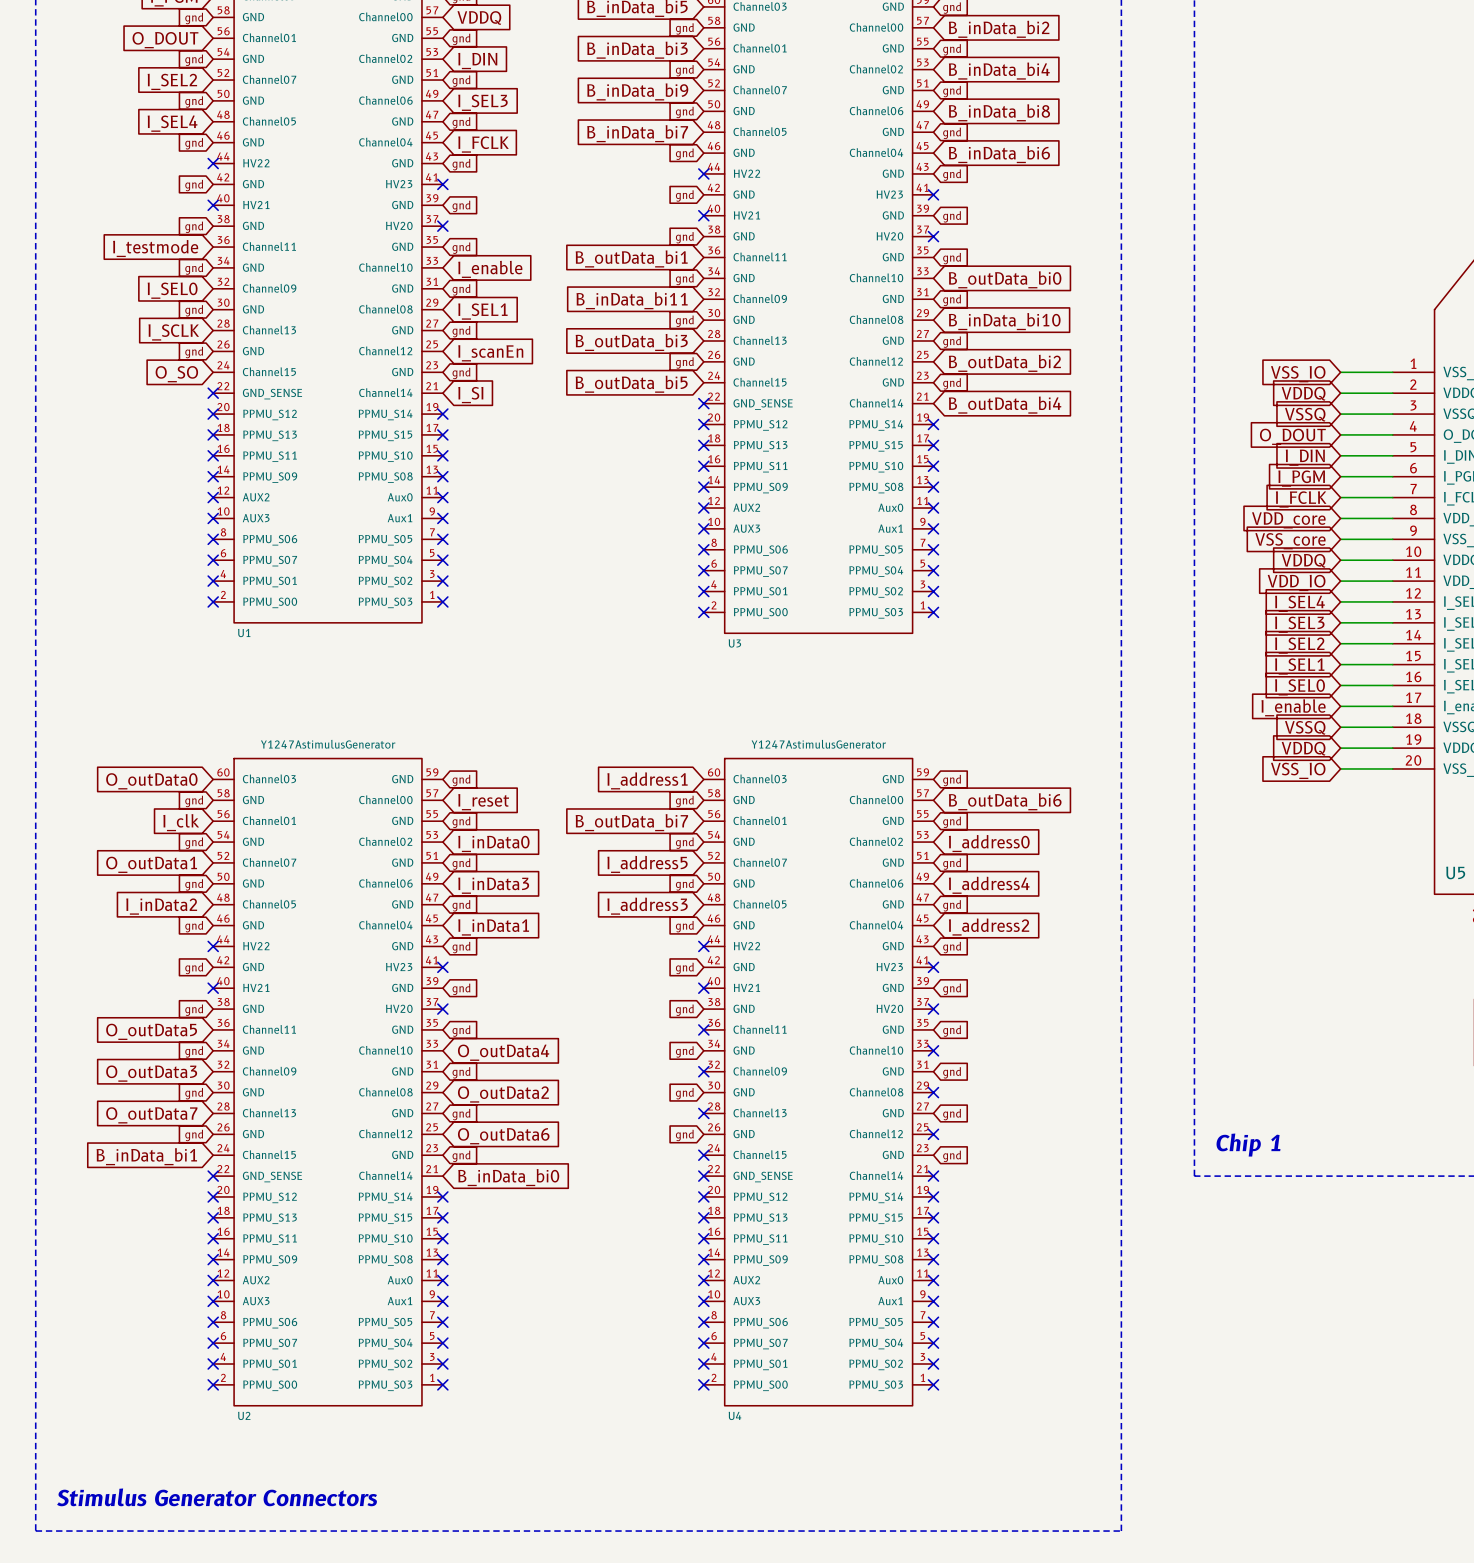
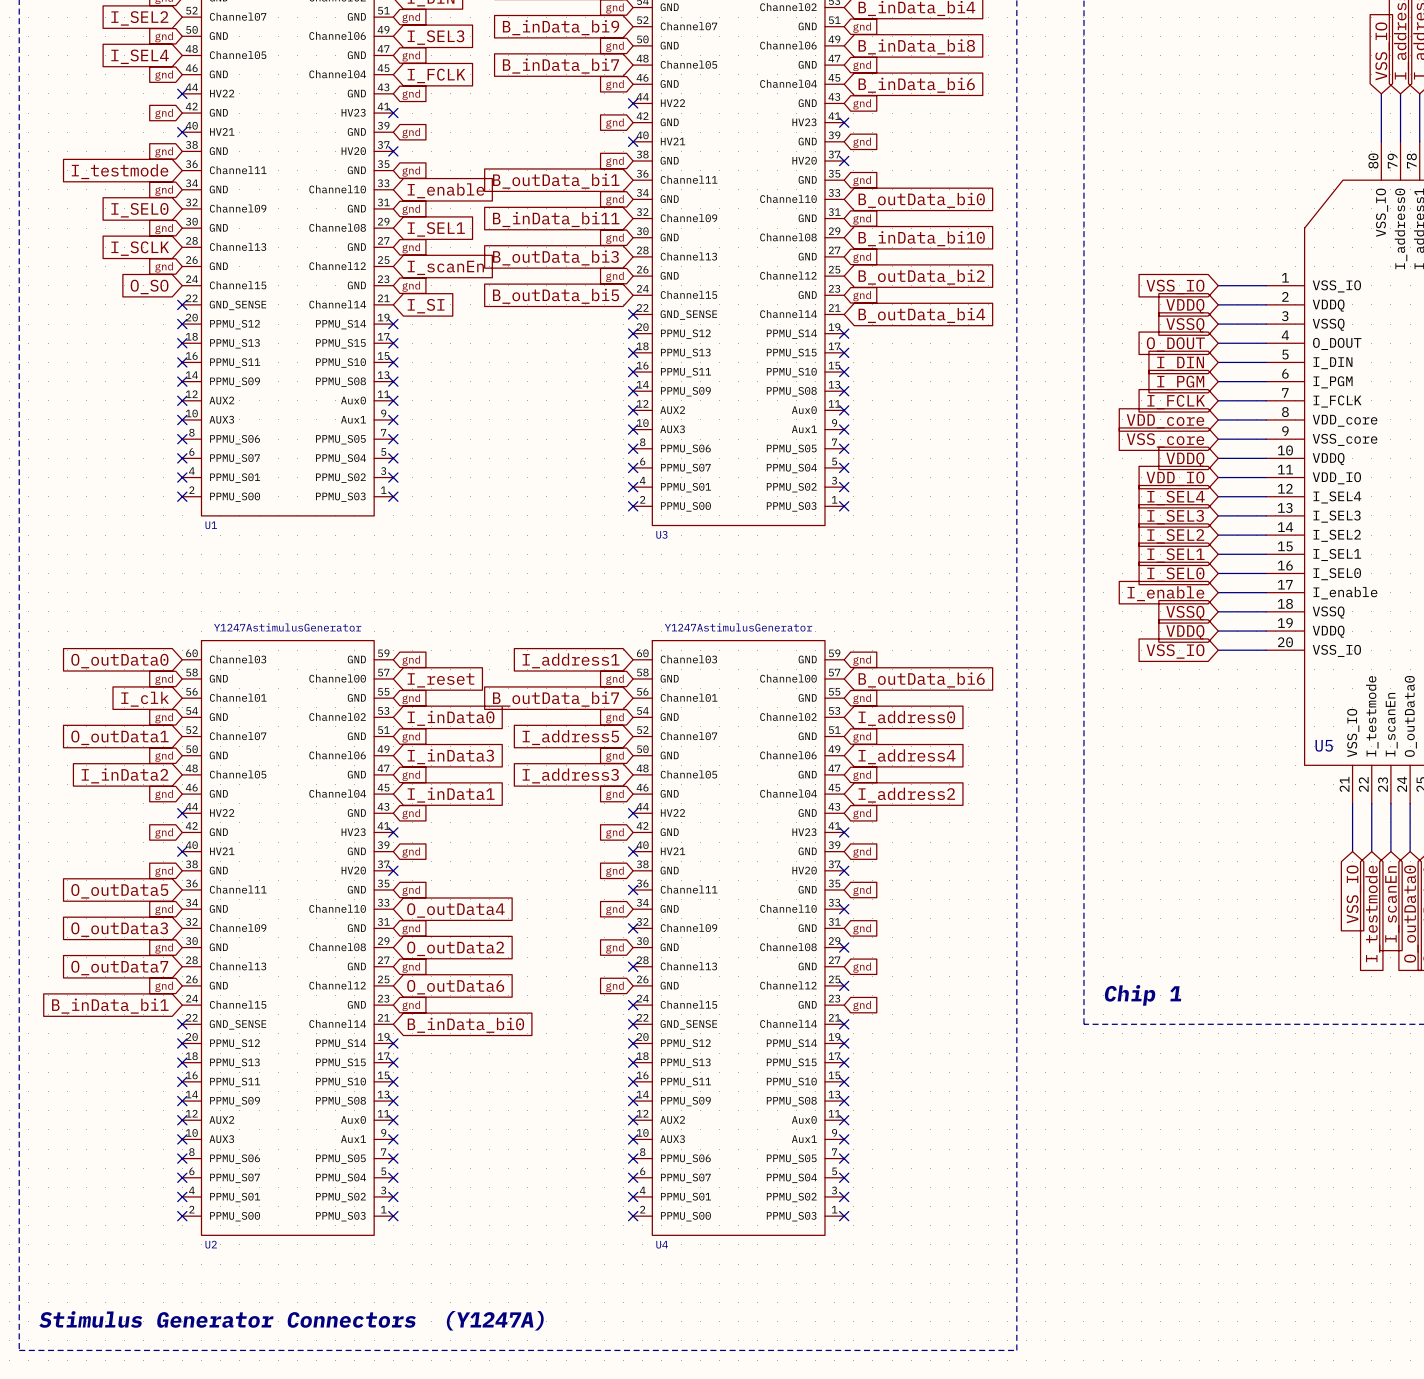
text: Stimulus Generator Connectors (217, 1497) -> Stimulus Generator Connectors (Y1247A) (291, 1320)

